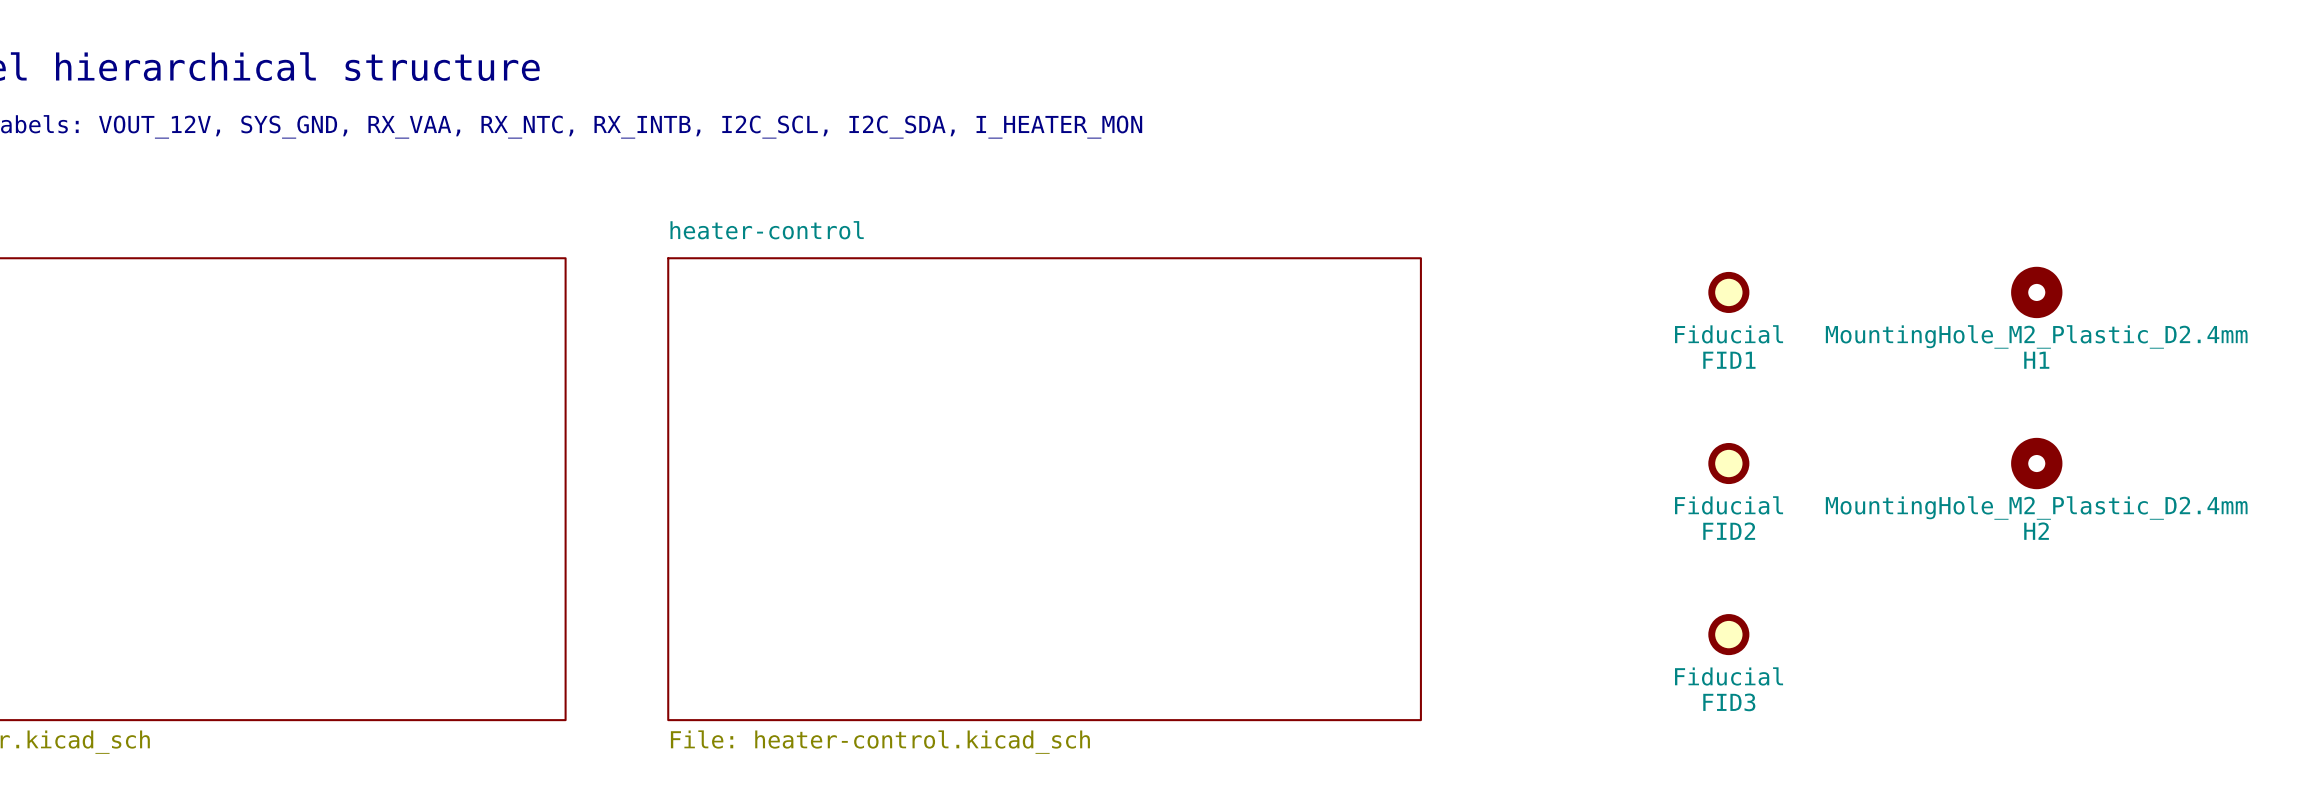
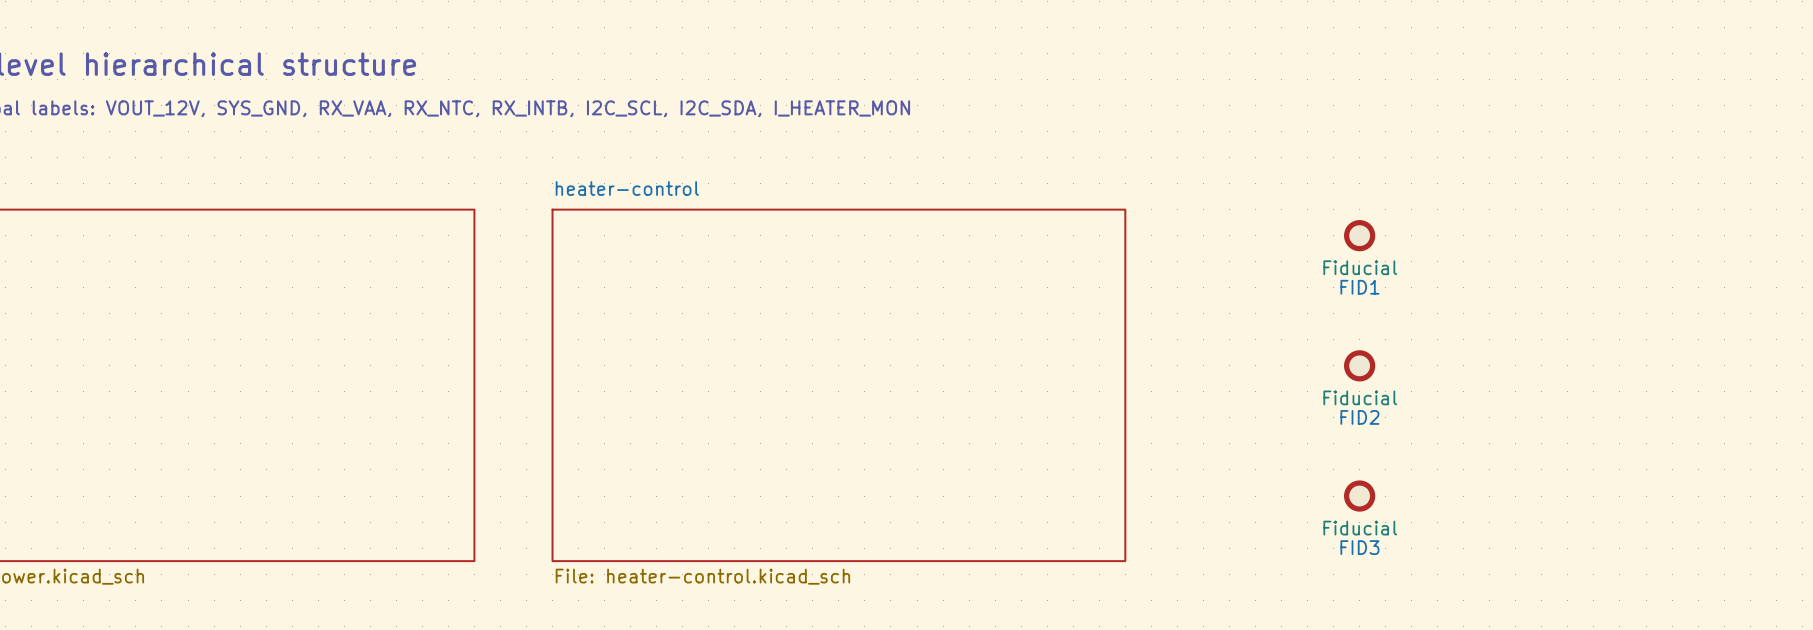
H1: MountingHole_M2_Plastic_D2.4mm (2036, 292) -> none
H2: MountingHole_M2_Plastic_D2.4mm (2036, 463) -> none

